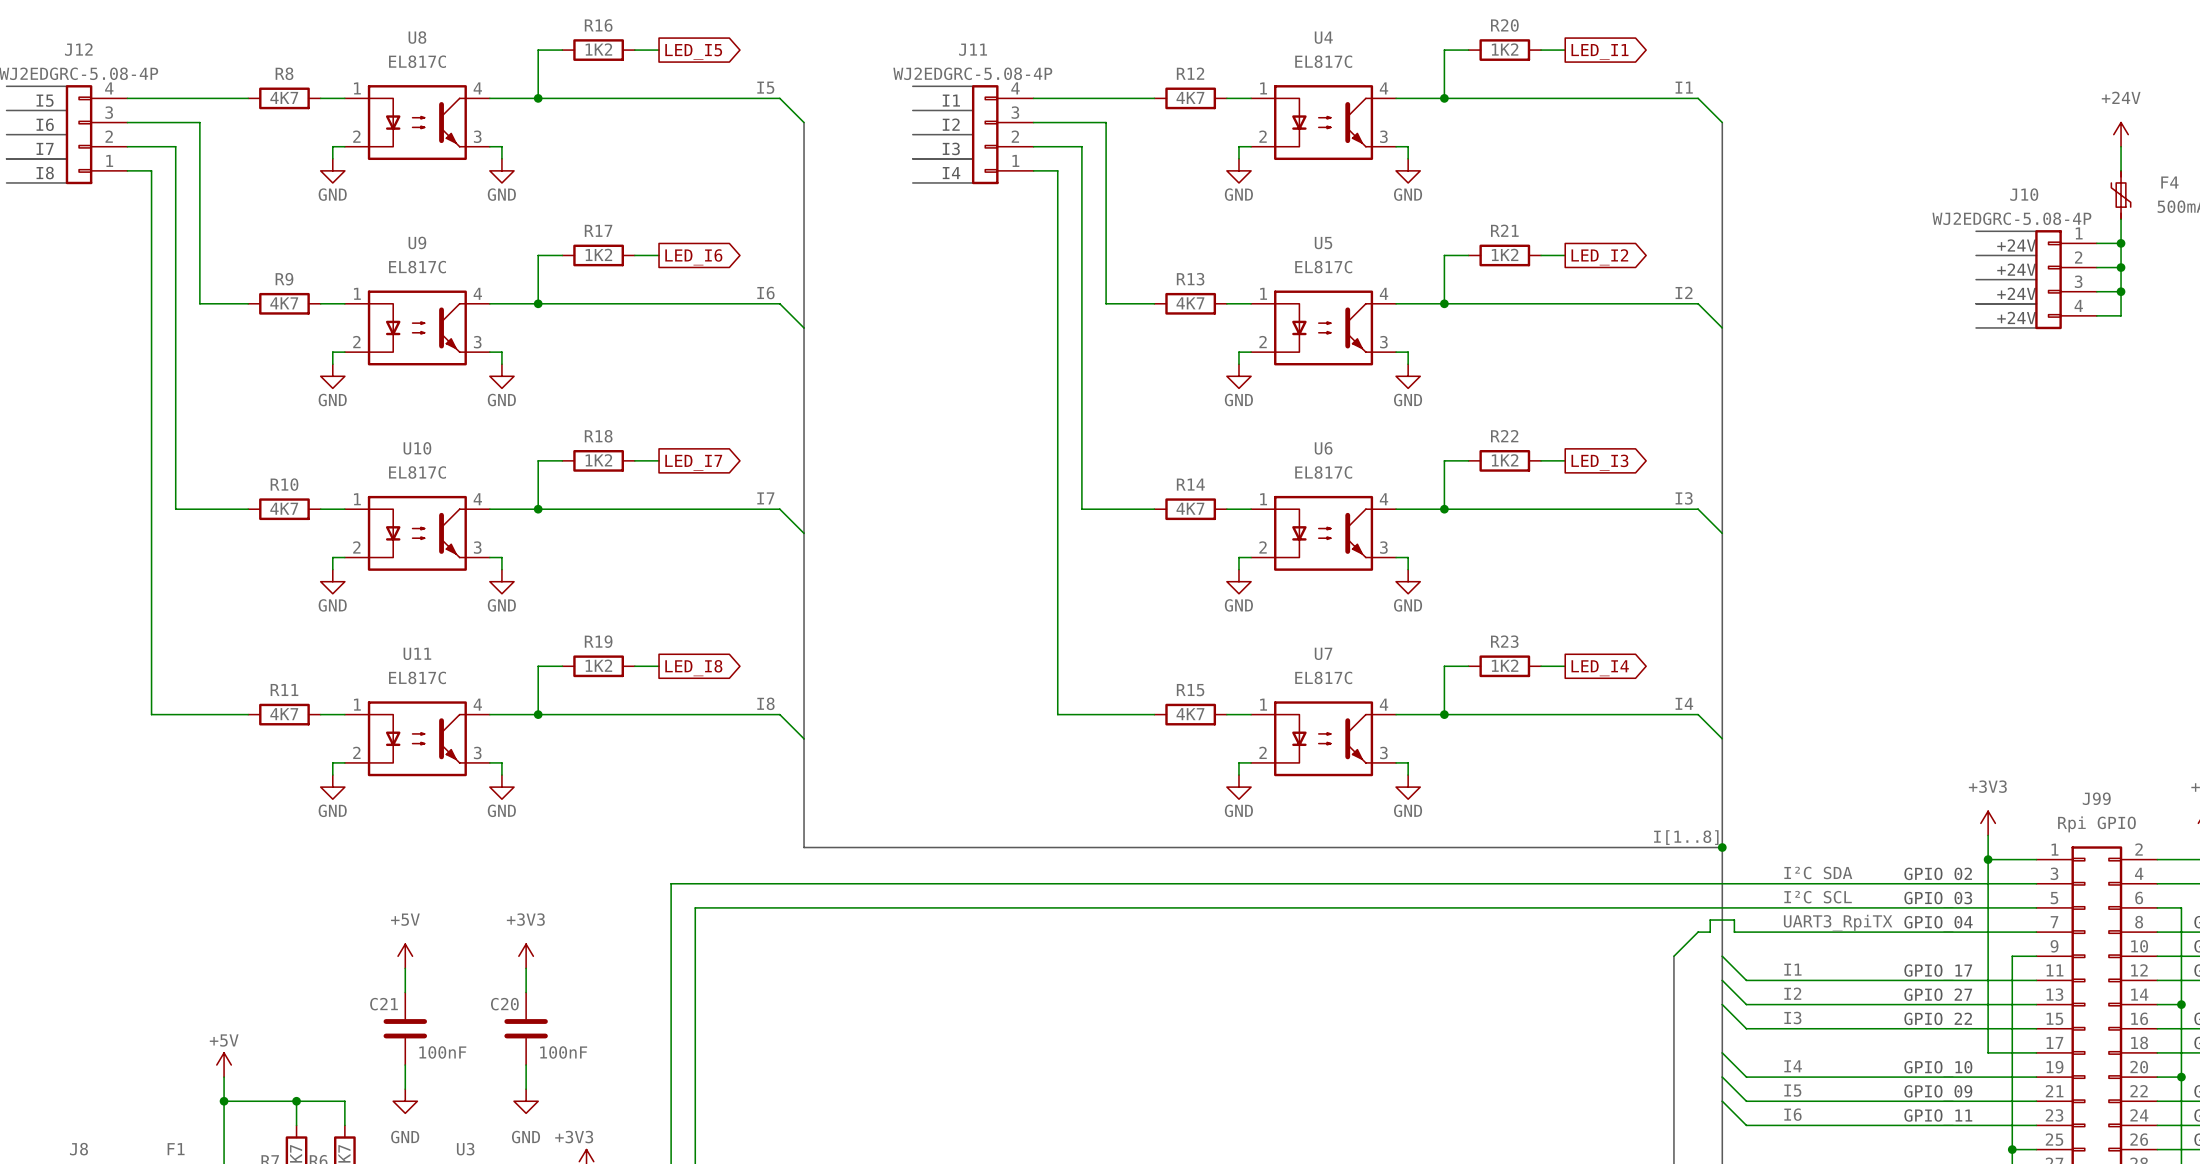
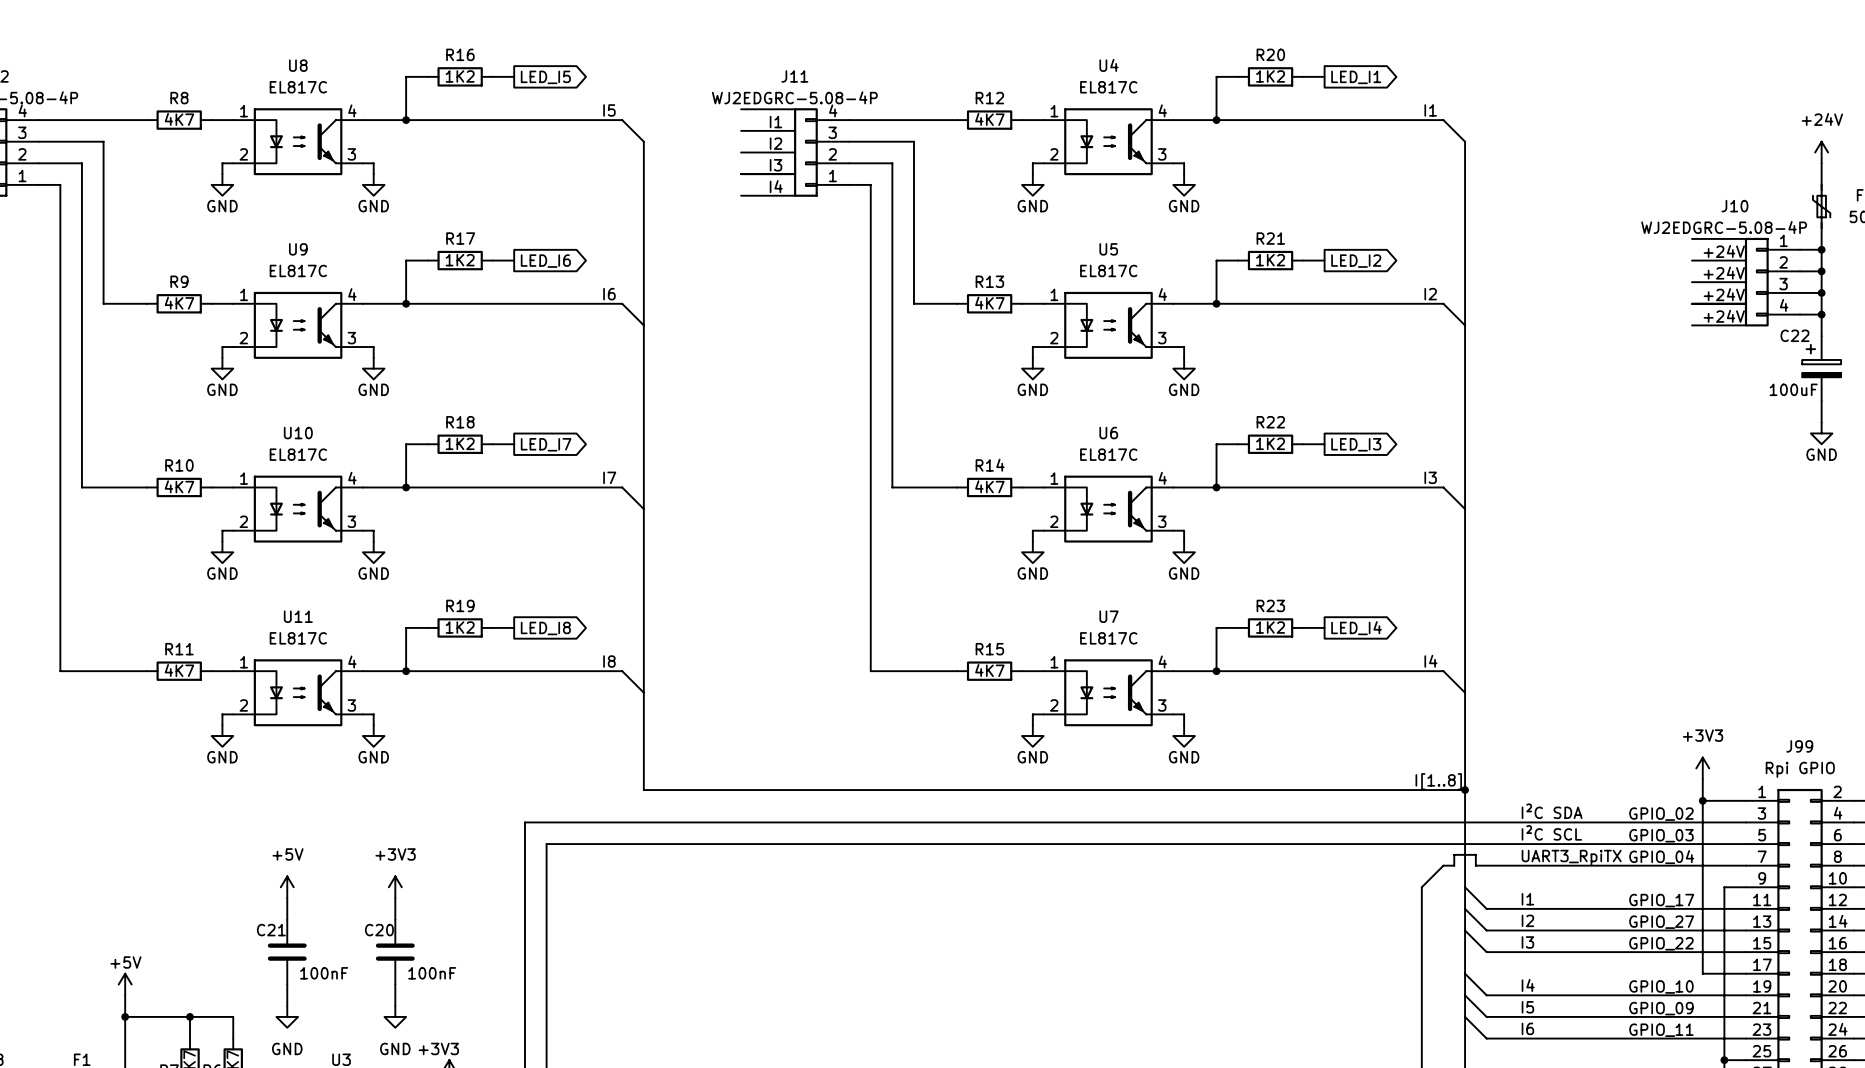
wire: none -> (1821, 314) (1821, 336)
junction: none -> (1821, 314)
C22: none -> 100uF (1821, 368)
wire: none -> (1821, 401) (1821, 422)
power symbol: none -> GND (1821, 433)

